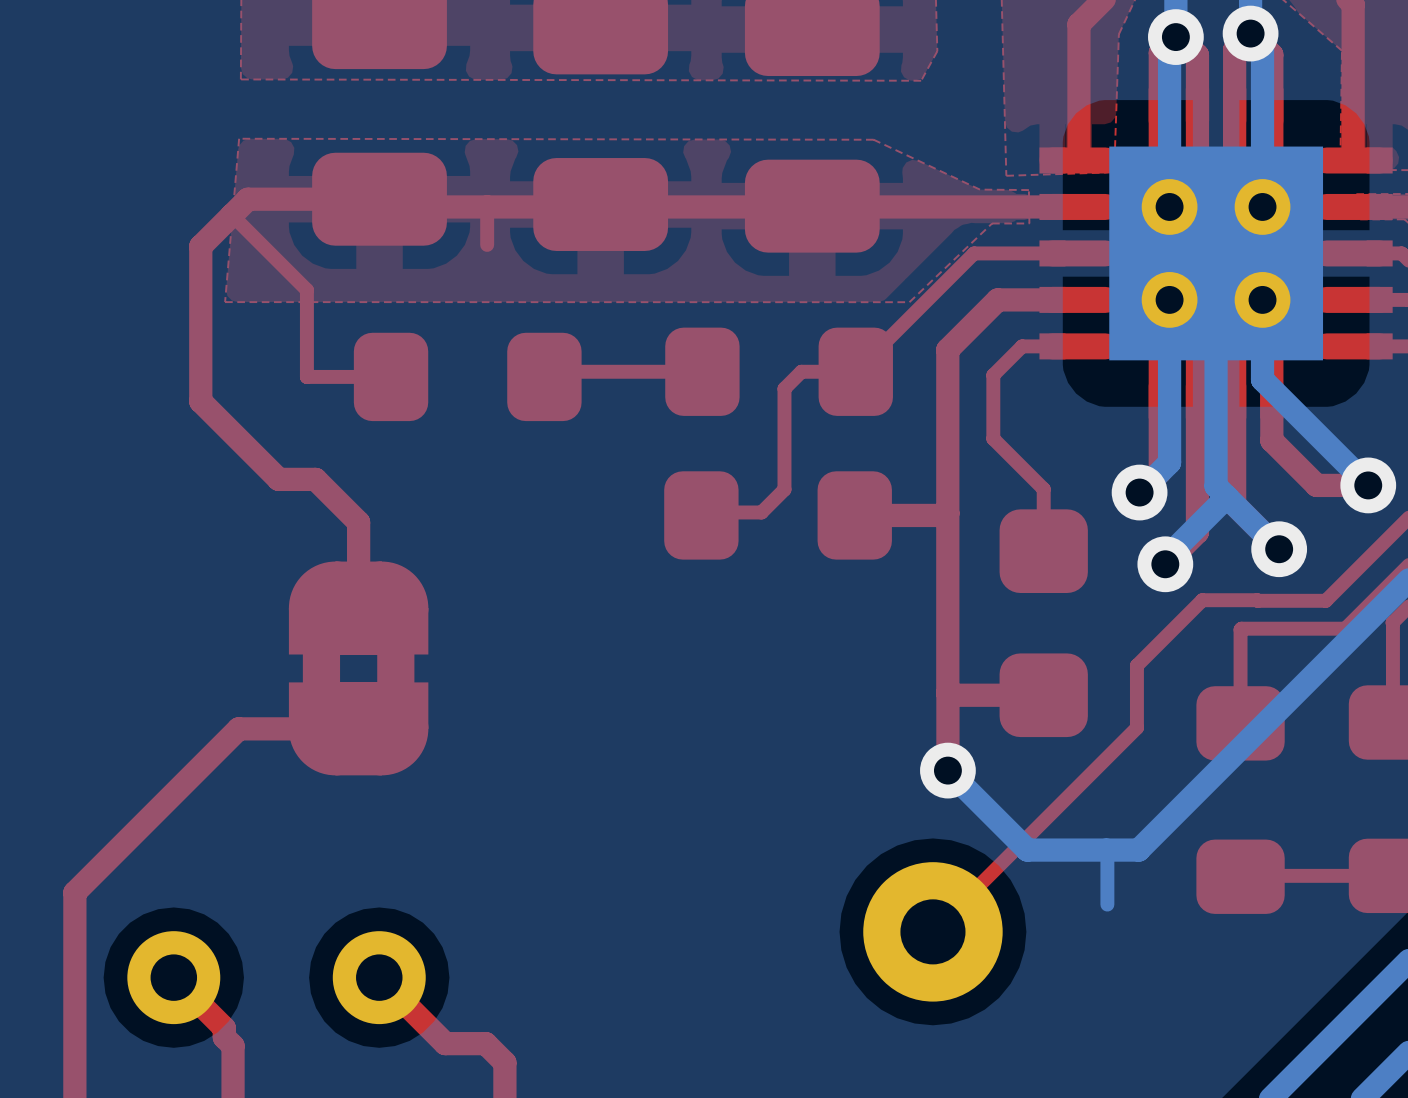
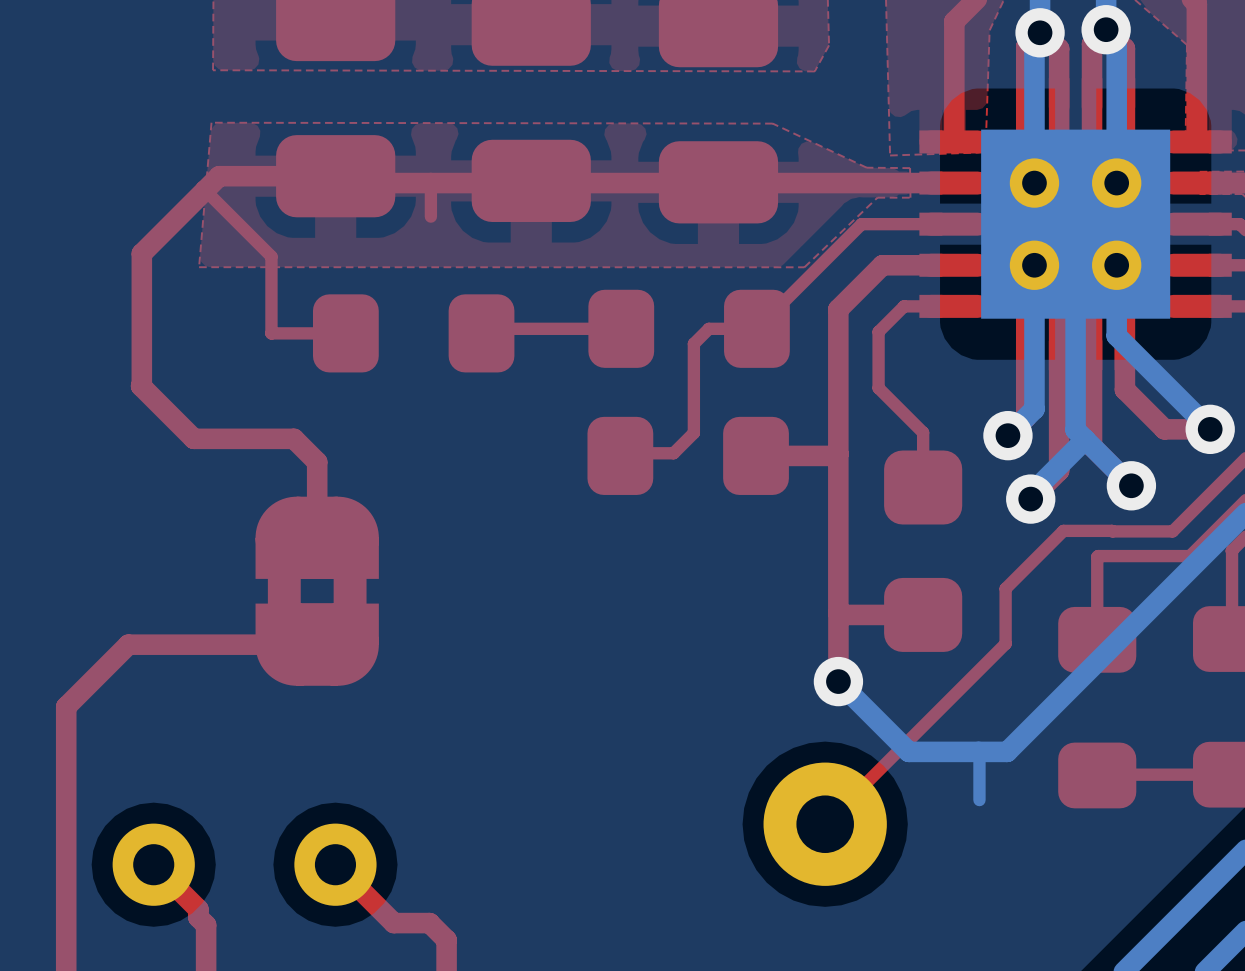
top track: (200, 246) (200, 401) (278, 479) (315, 479) (332, 496) -> (177, 217) (141, 253) (141, 385)
top track: none -> (141, 386) (193, 438) (293, 438)
top track: (238, 728) (74, 892) -> (211, 644) (128, 644) (66, 706) (66, 789)

